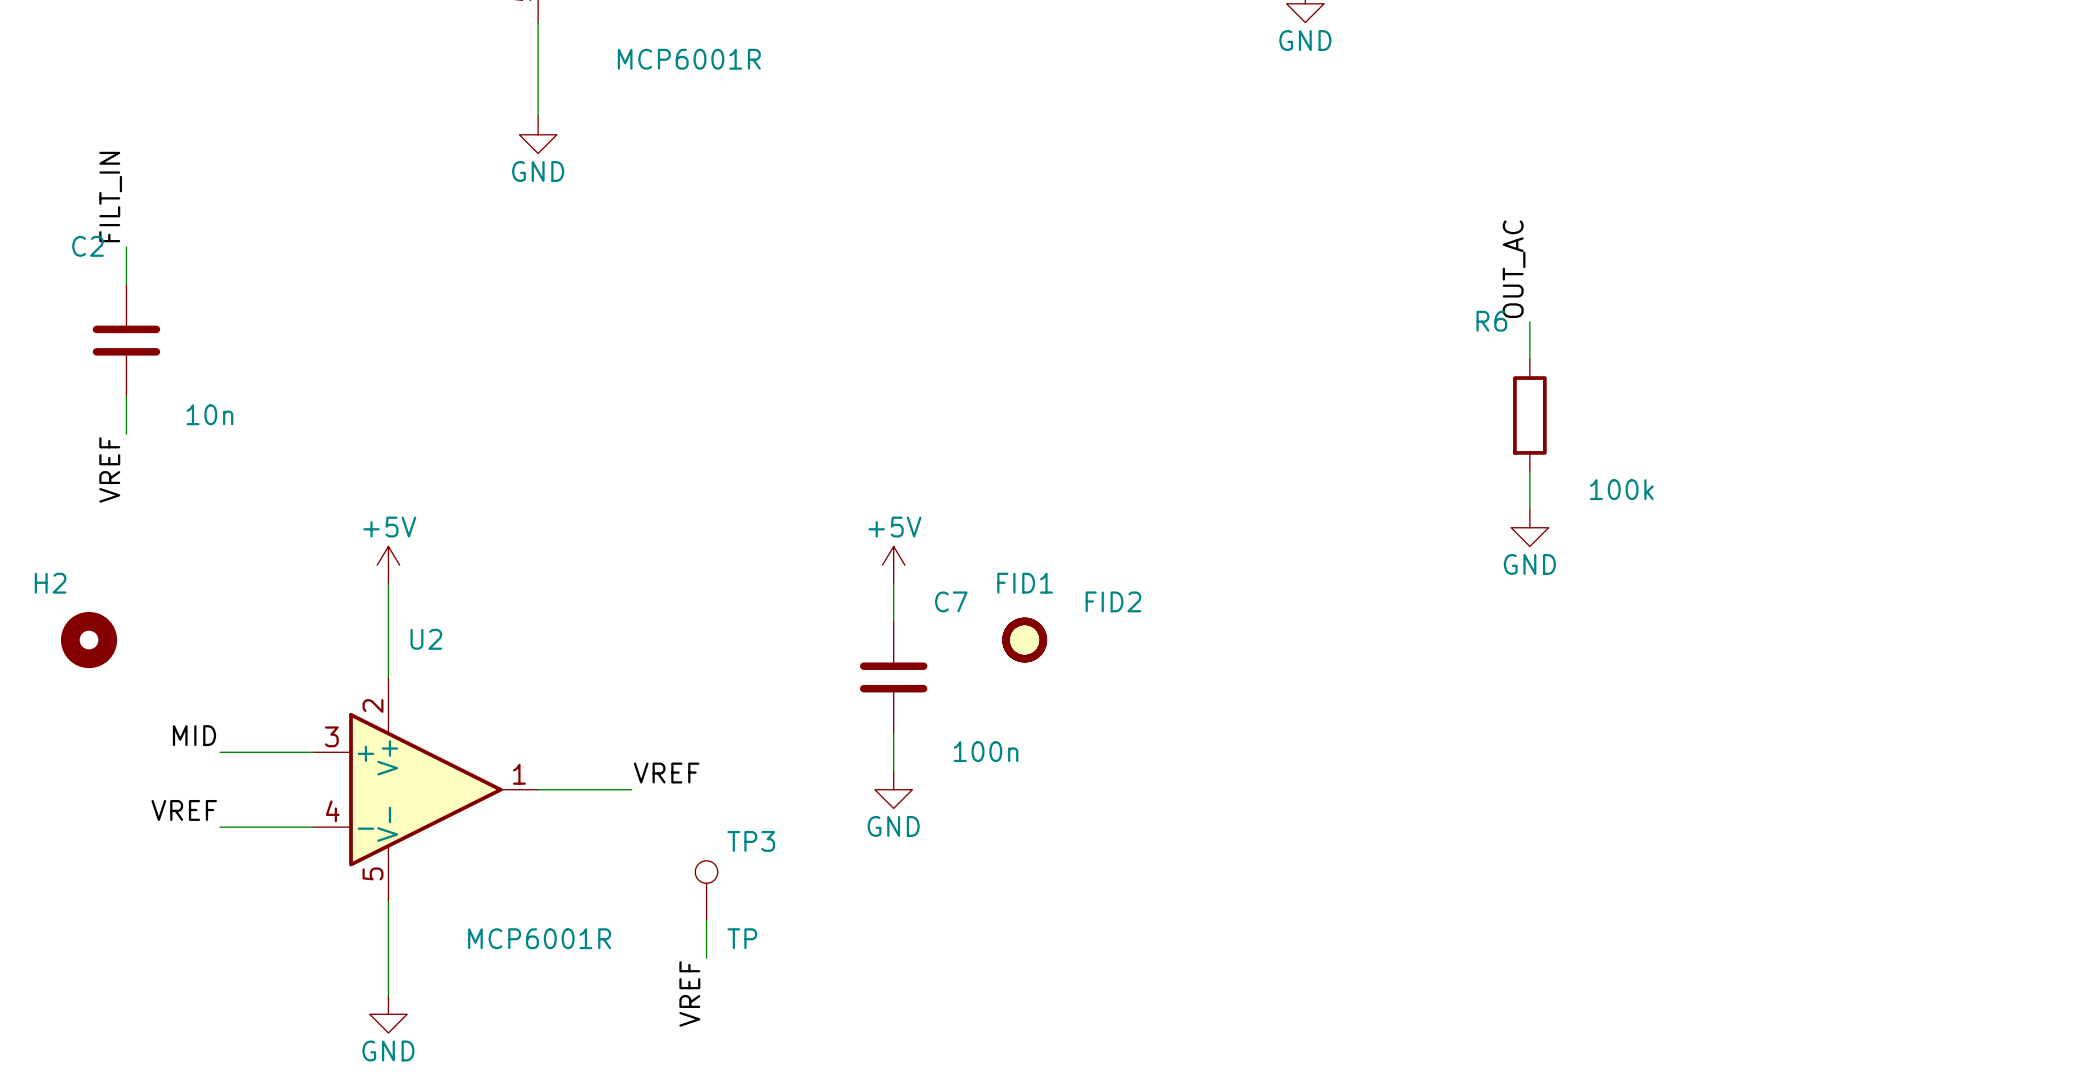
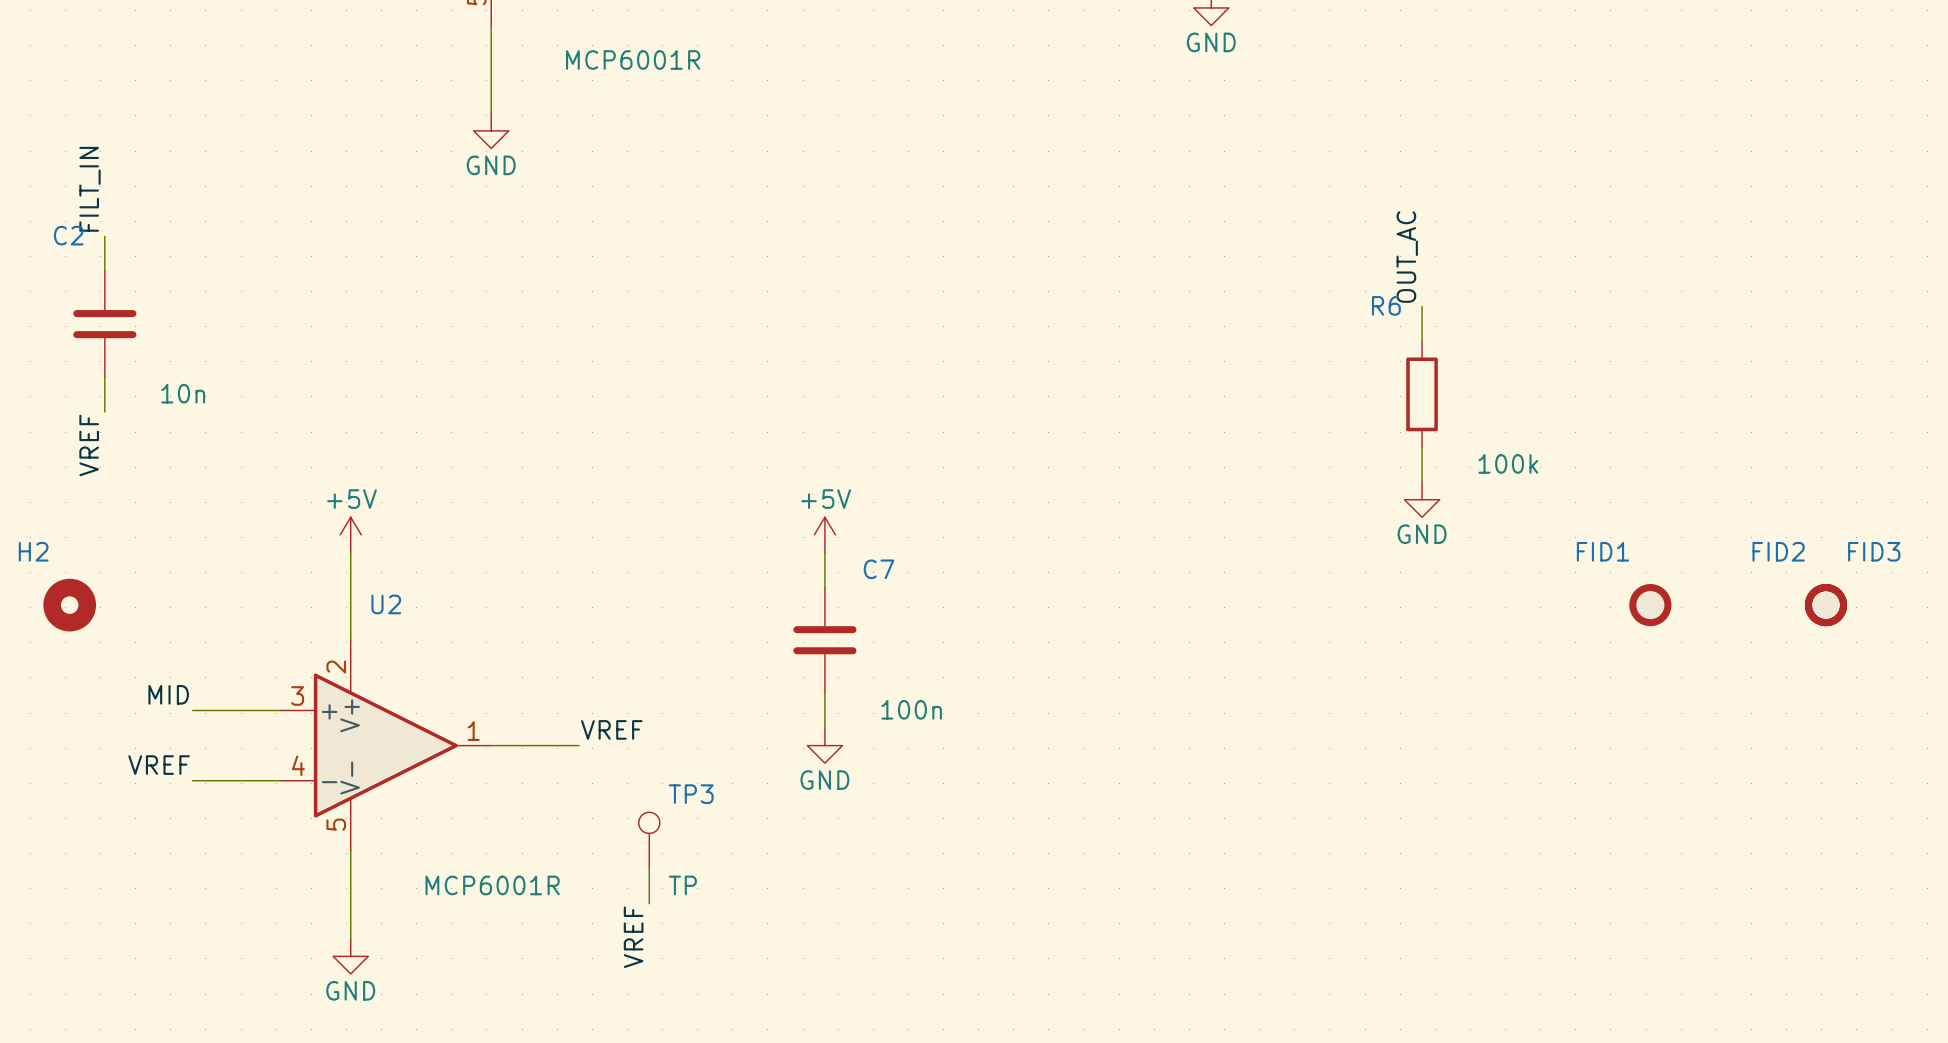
FID1 name position: FID1 (1025, 583) -> FID1 (1602, 551)
FID2 name position: FID2 (1113, 601) -> FID2 (1778, 551)
FID1 position: (1024, 640) -> (1650, 605)
FID2 position: (1024, 640) -> (1826, 605)
FID3: none -> (1826, 605)

